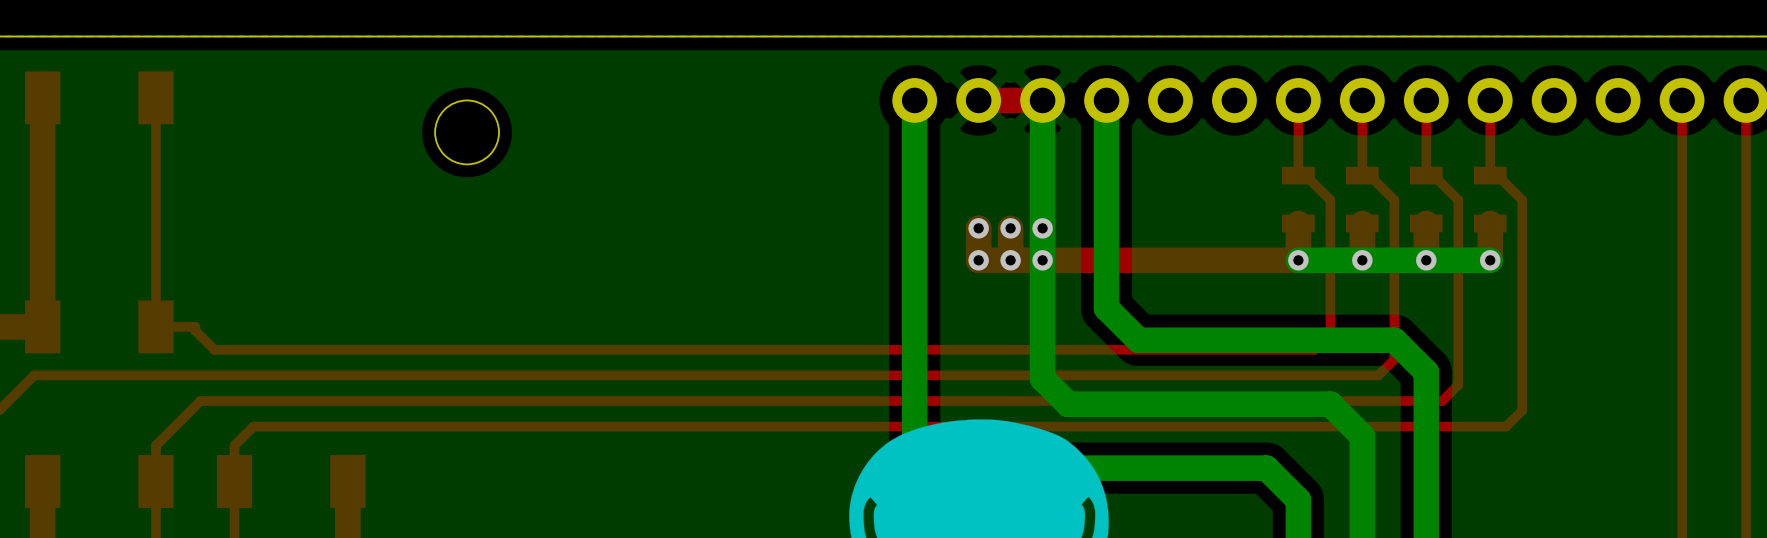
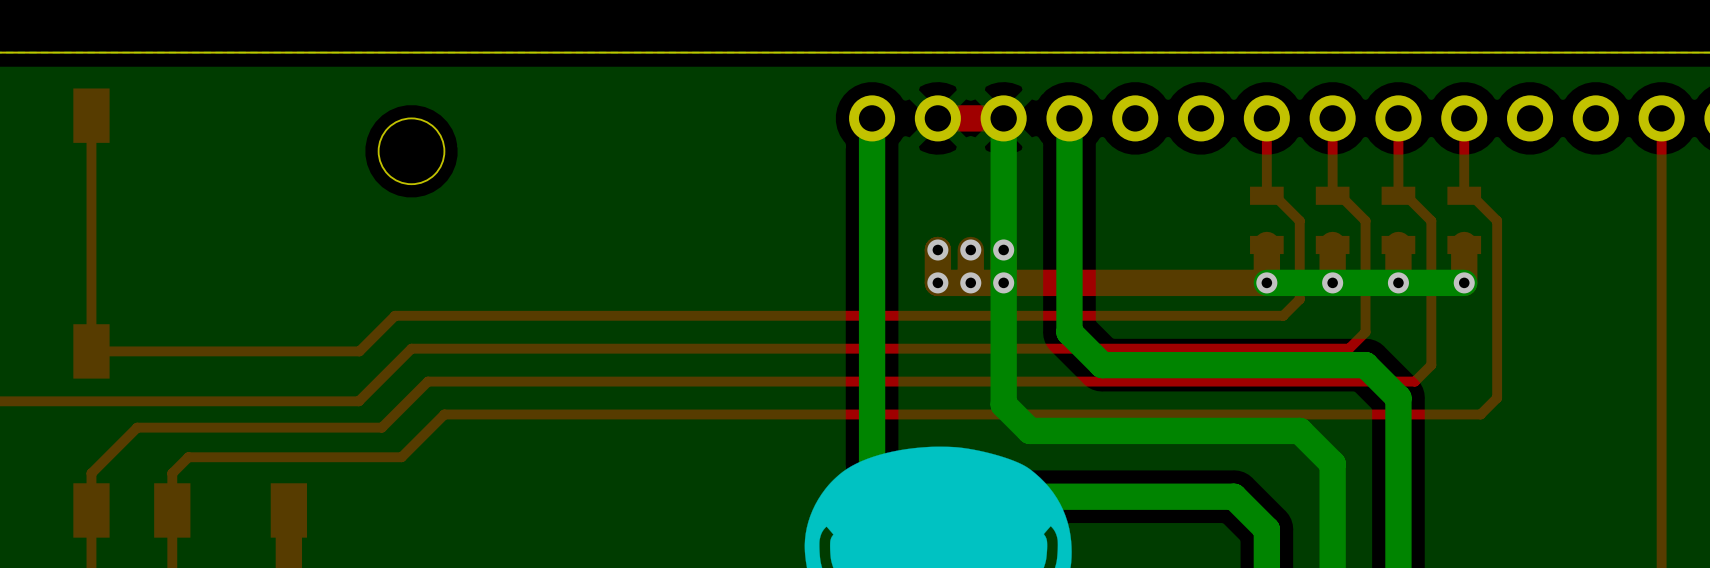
top track: (1330, 276) (1330, 333) (1314, 349) (214, 349) (195, 330) (195, 326) -> (1299, 299) (1283, 315) (395, 315) (359, 351) (131, 351)
top track: (1394, 308) (1394, 359) (1378, 375) (415, 375) -> (1365, 332) (1349, 348) (411, 348) (358, 401)
top track: (1458, 340) (1458, 385) (1442, 401) (438, 401) -> (1431, 365) (1414, 381) (427, 381) (381, 427)
top track: (1522, 372) (1522, 410) (1506, 426) (253, 426) (250, 429) -> (1497, 398) (1480, 414) (444, 414) (401, 457) (188, 457)

